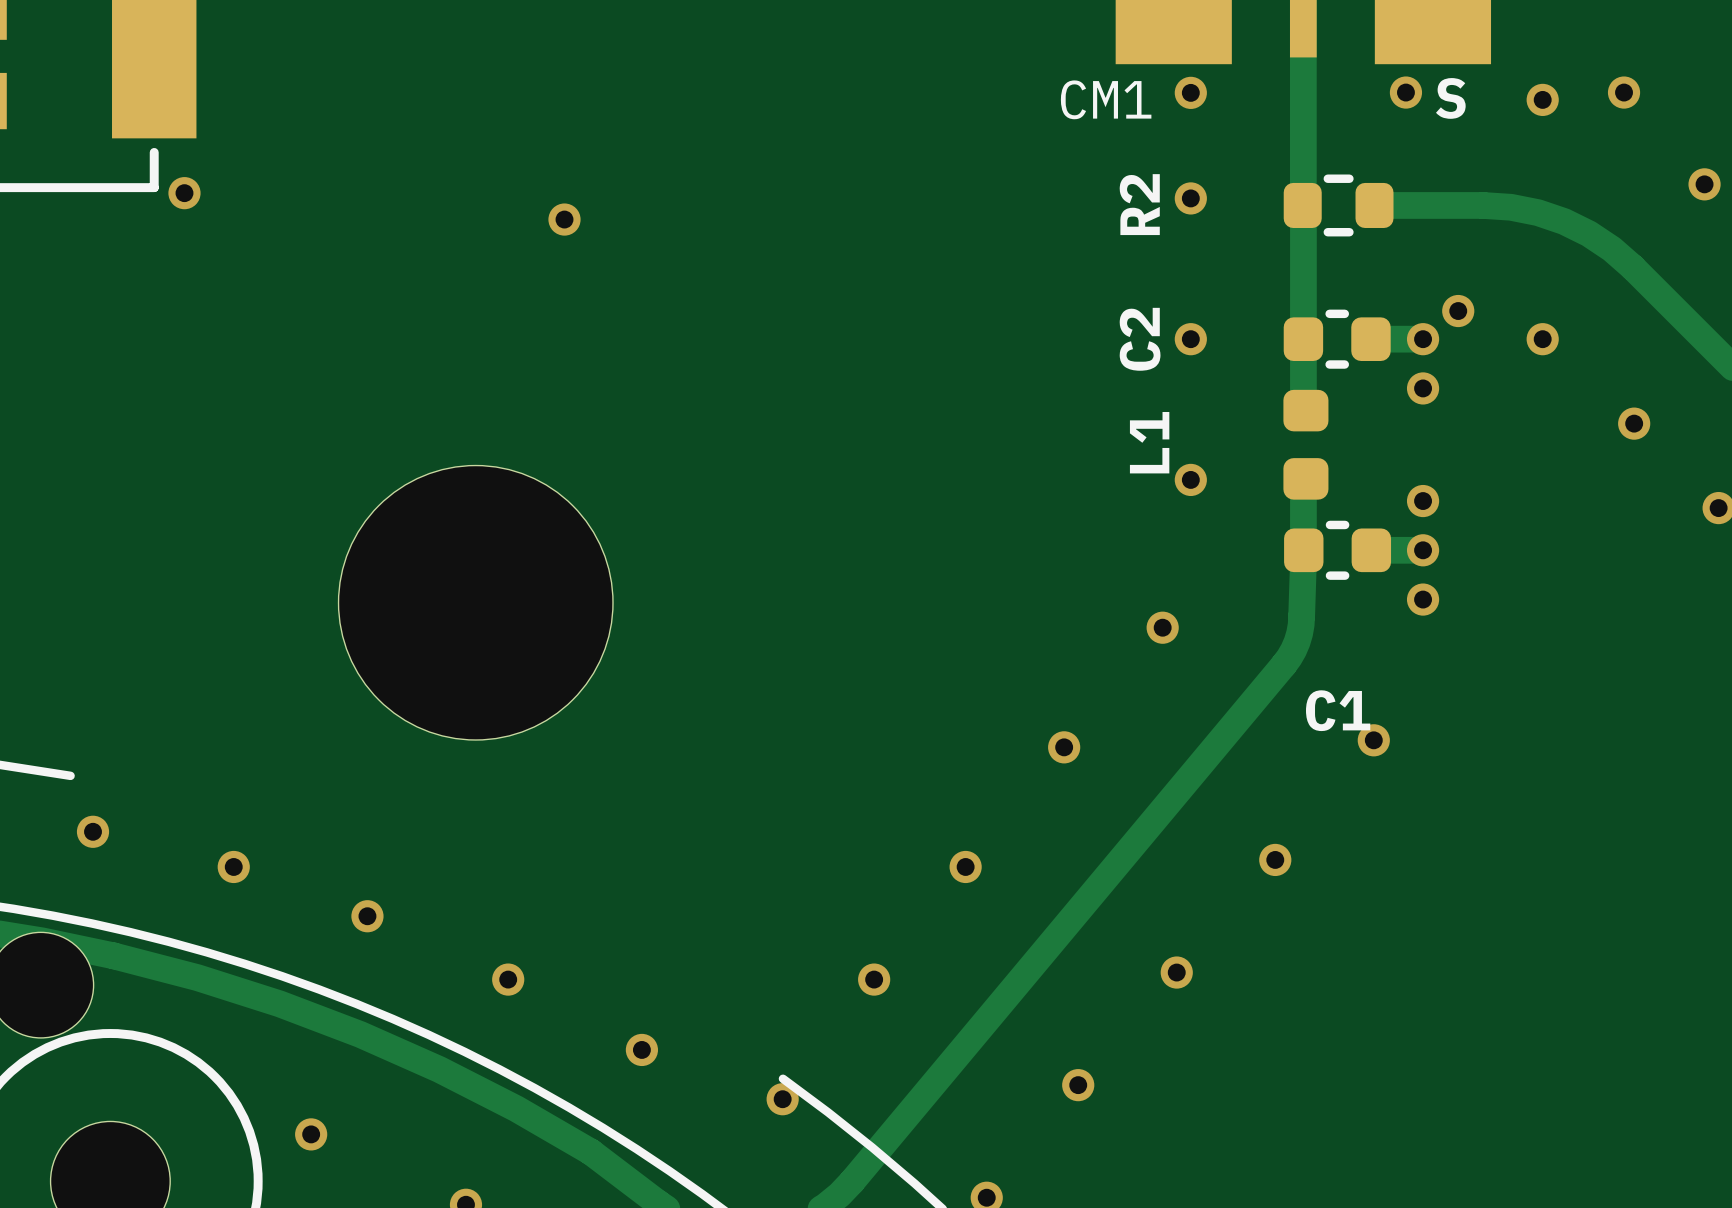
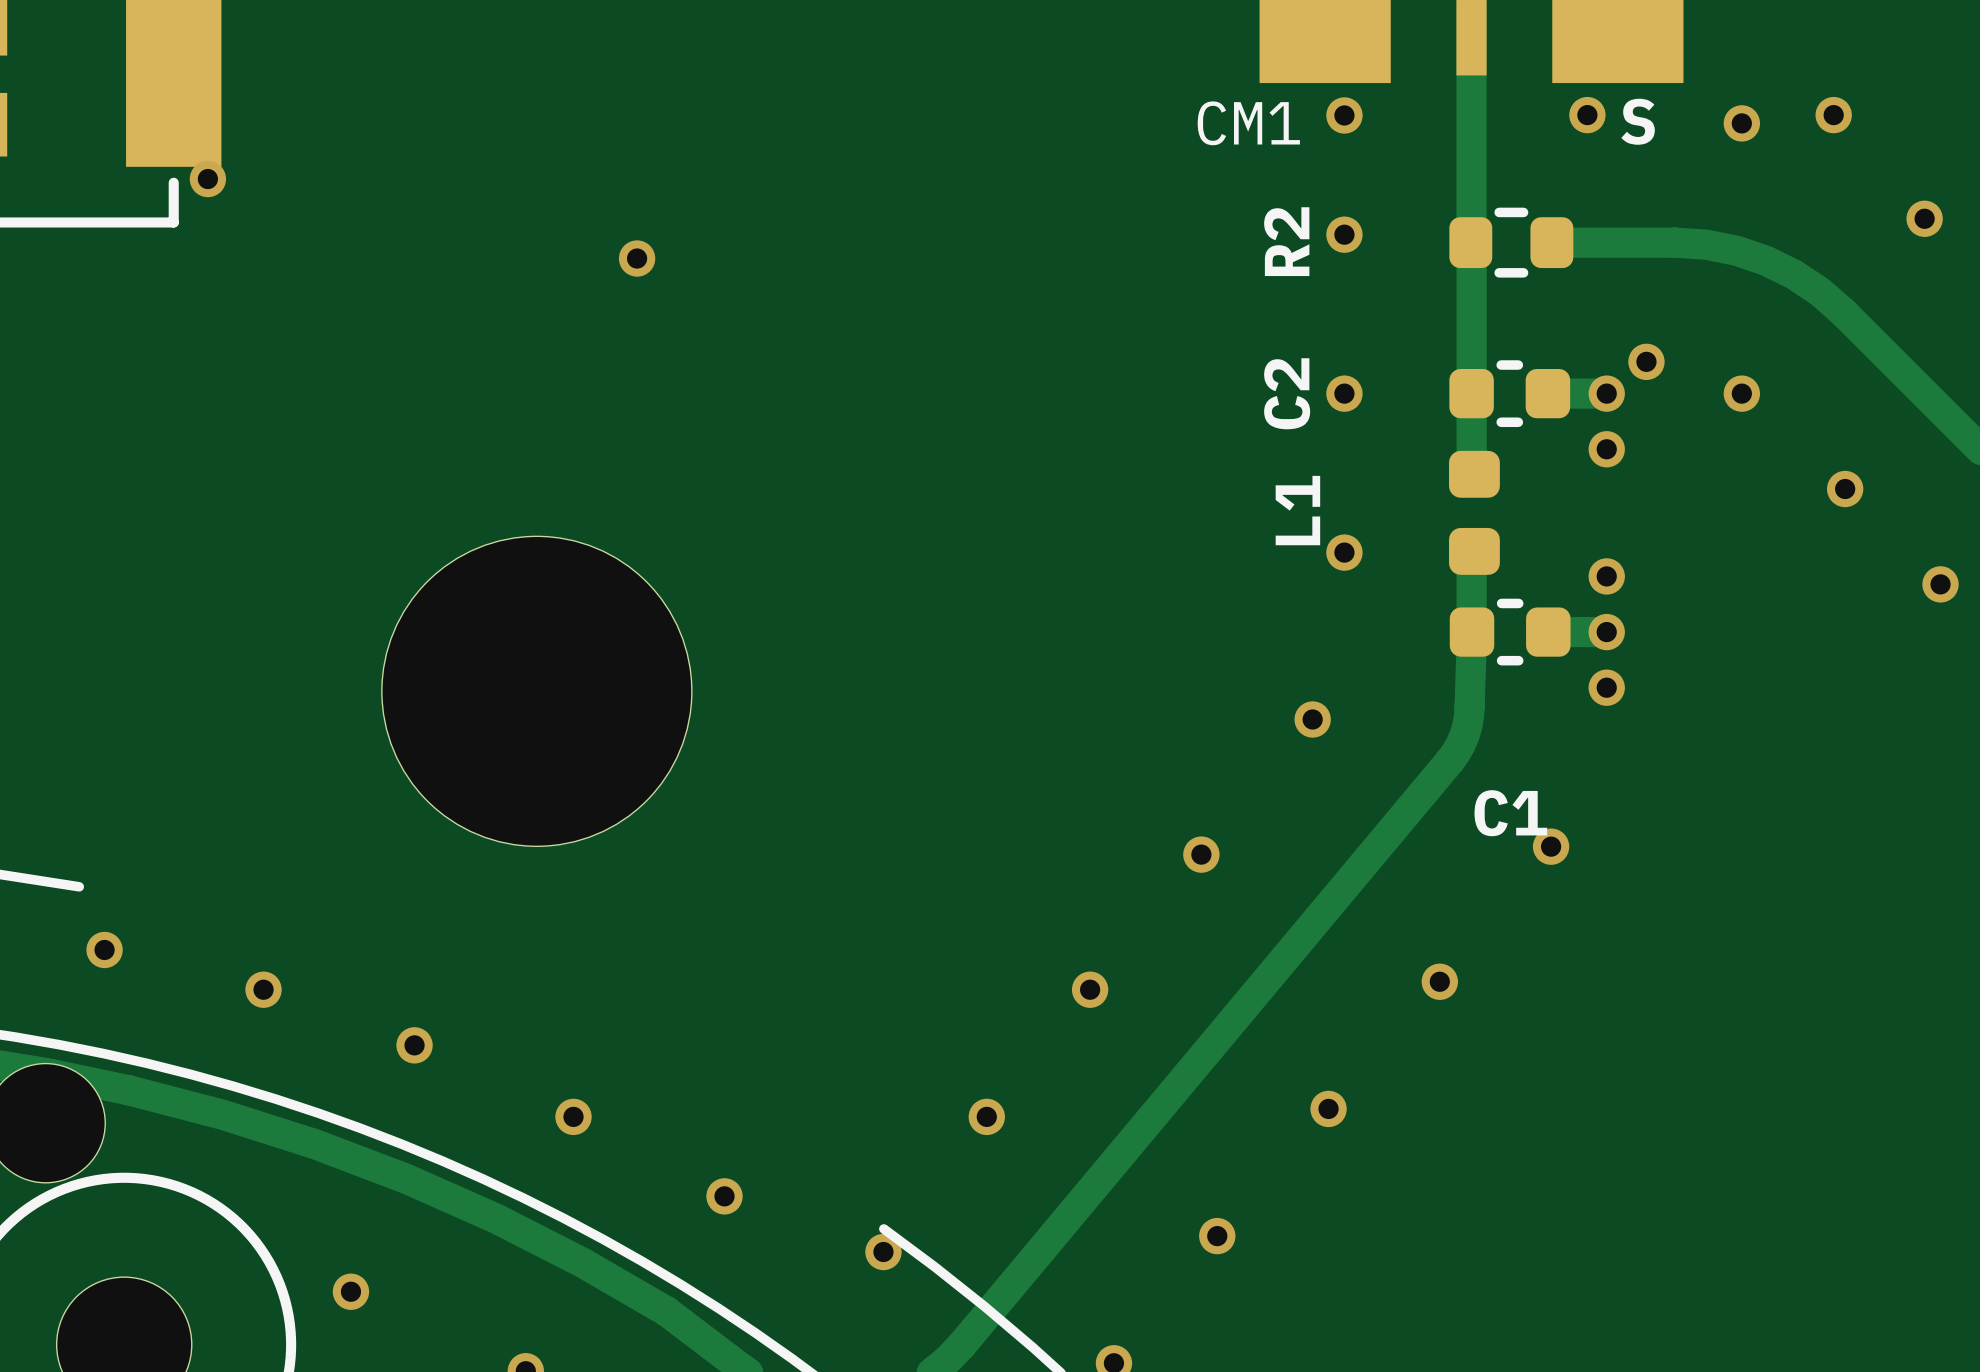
via position: (184, 193) -> (207, 179)

